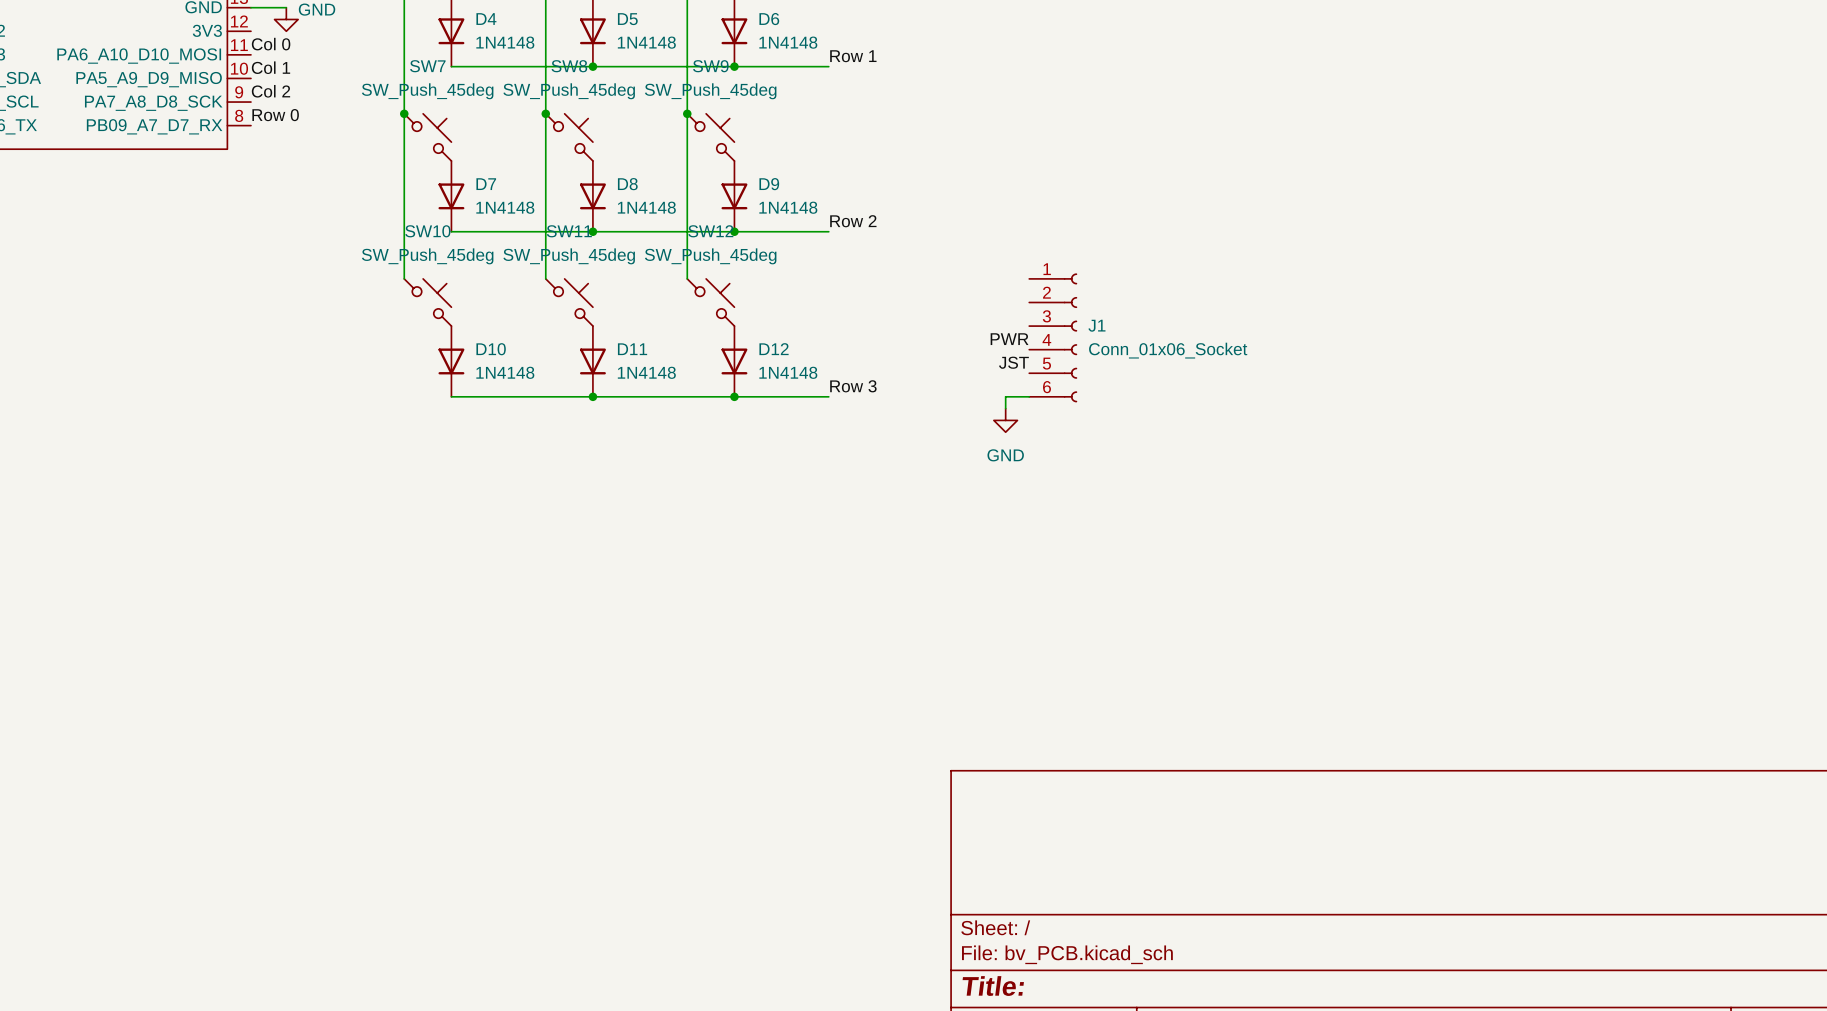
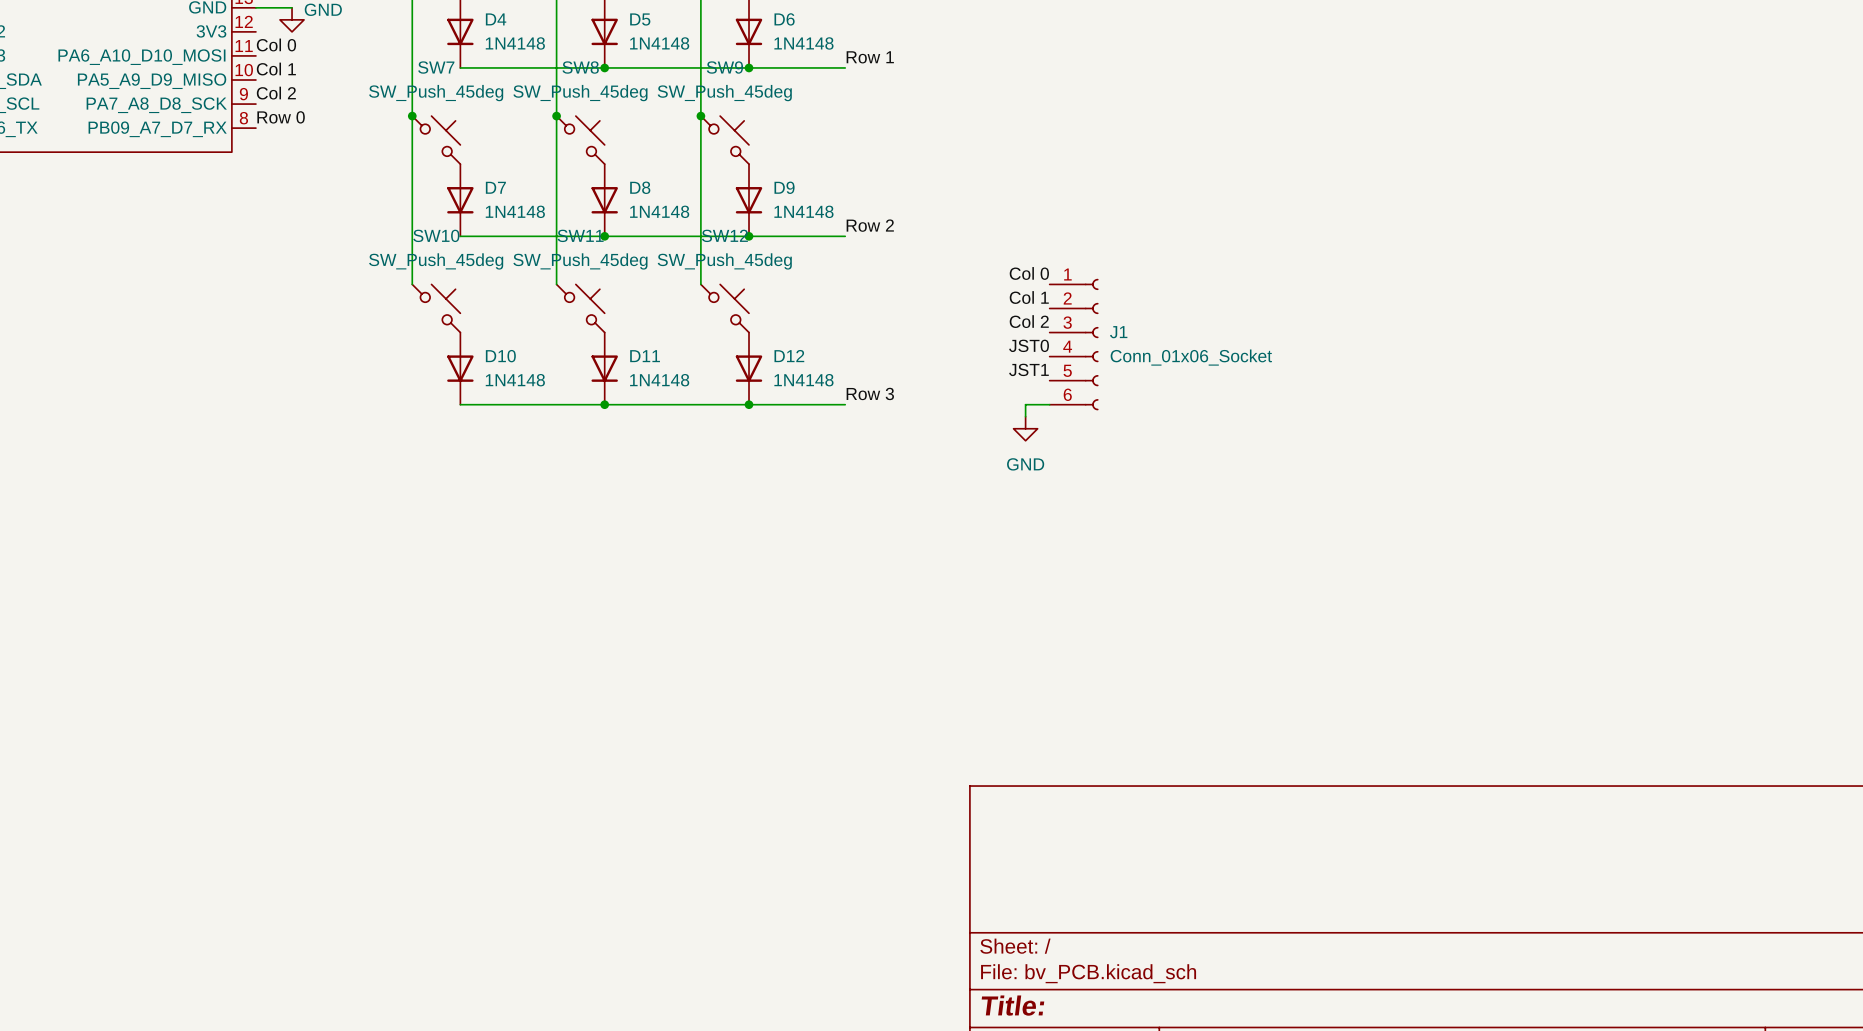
label: none -> Col 0 (1029, 273)
label: none -> Col 1 (1029, 297)
label: none -> Col 2 (1029, 321)
label: PWR (1009, 339) -> JST0 (1029, 345)
label: JST (1013, 362) -> JST1 (1028, 369)

